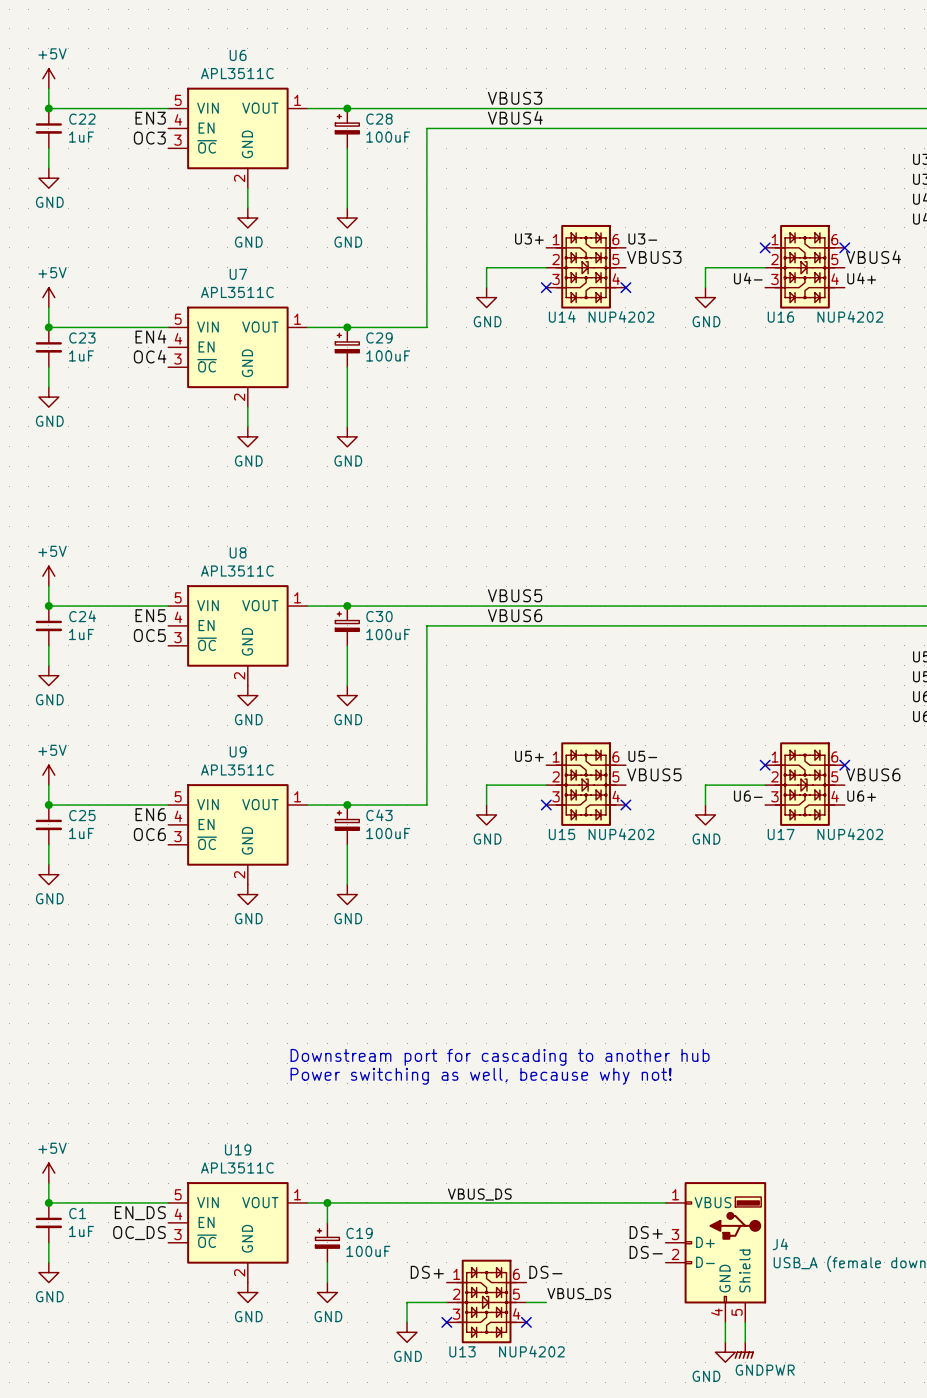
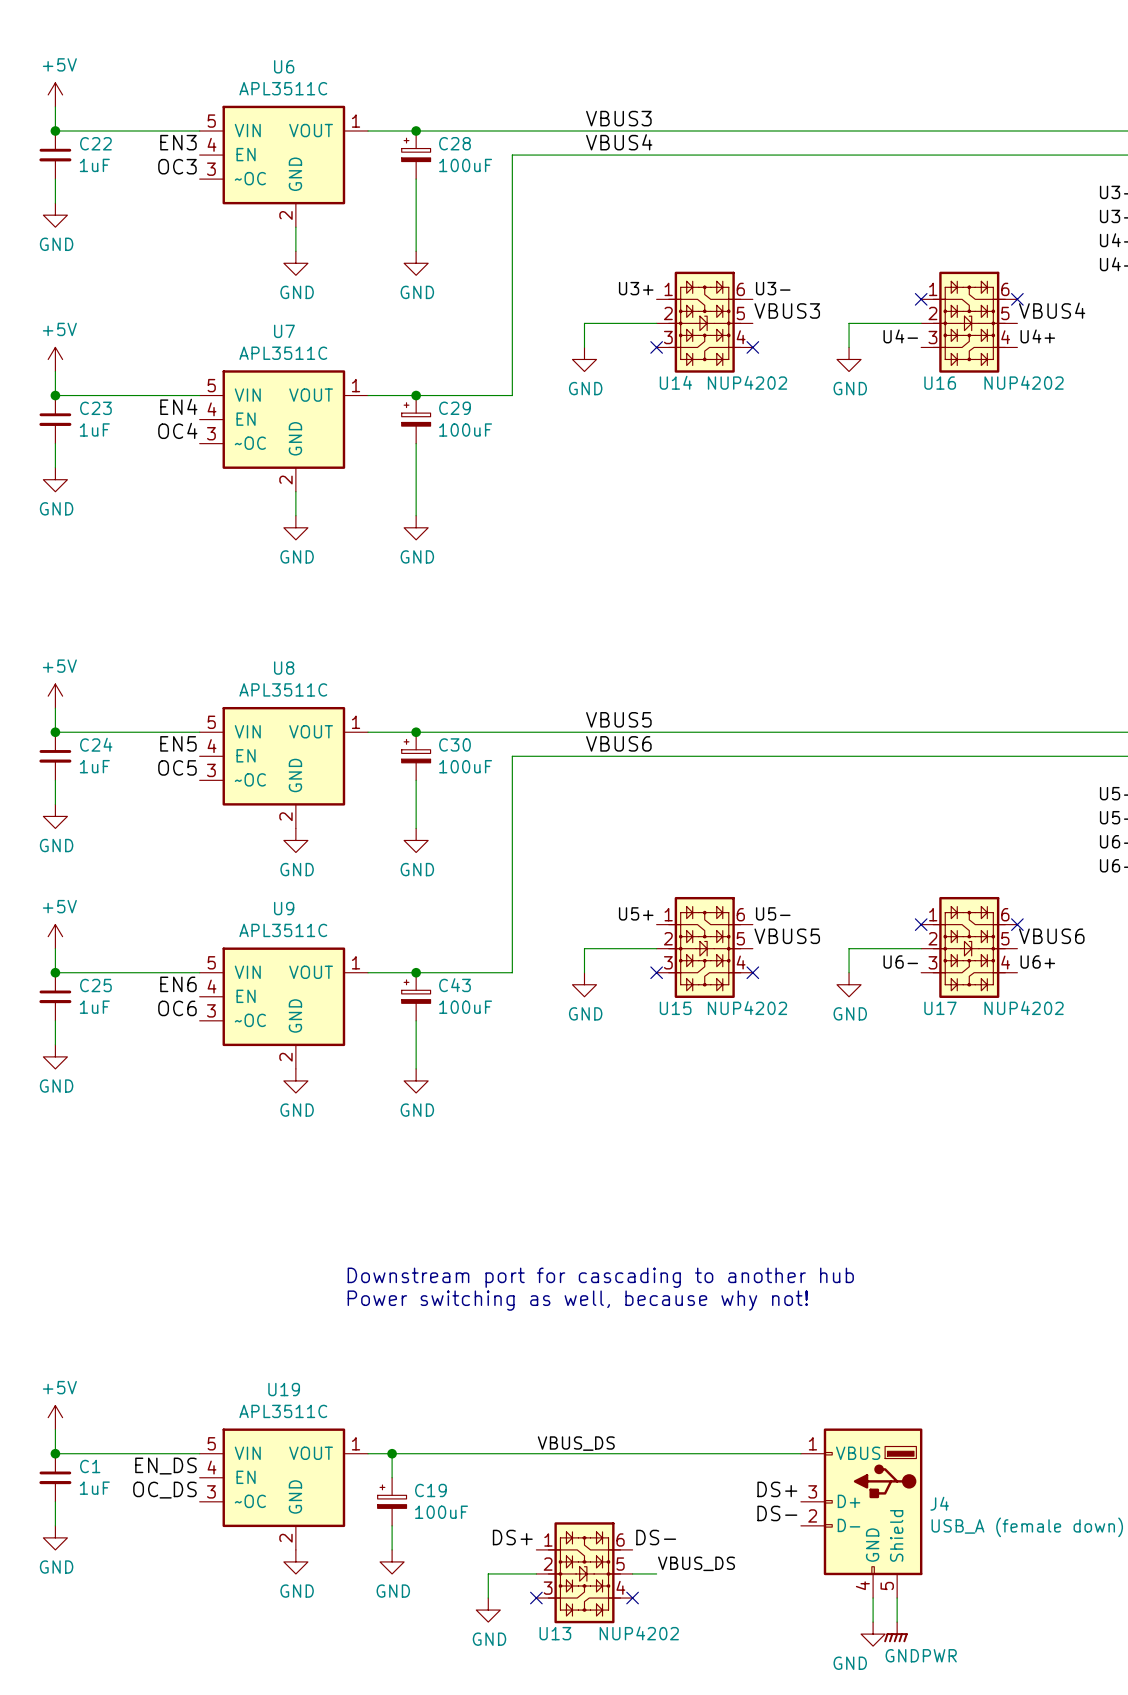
U6 pin name: ~{OC} (207, 146) -> ~OC (250, 178)
U7 pin name: ~{OC} (207, 365) -> ~OC (250, 443)
U8 pin name: ~{OC} (207, 644) -> ~OC (250, 779)
U9 pin name: ~{OC} (207, 843) -> ~OC (250, 1020)
U19 pin name: ~{OC} (207, 1241) -> ~OC (250, 1501)

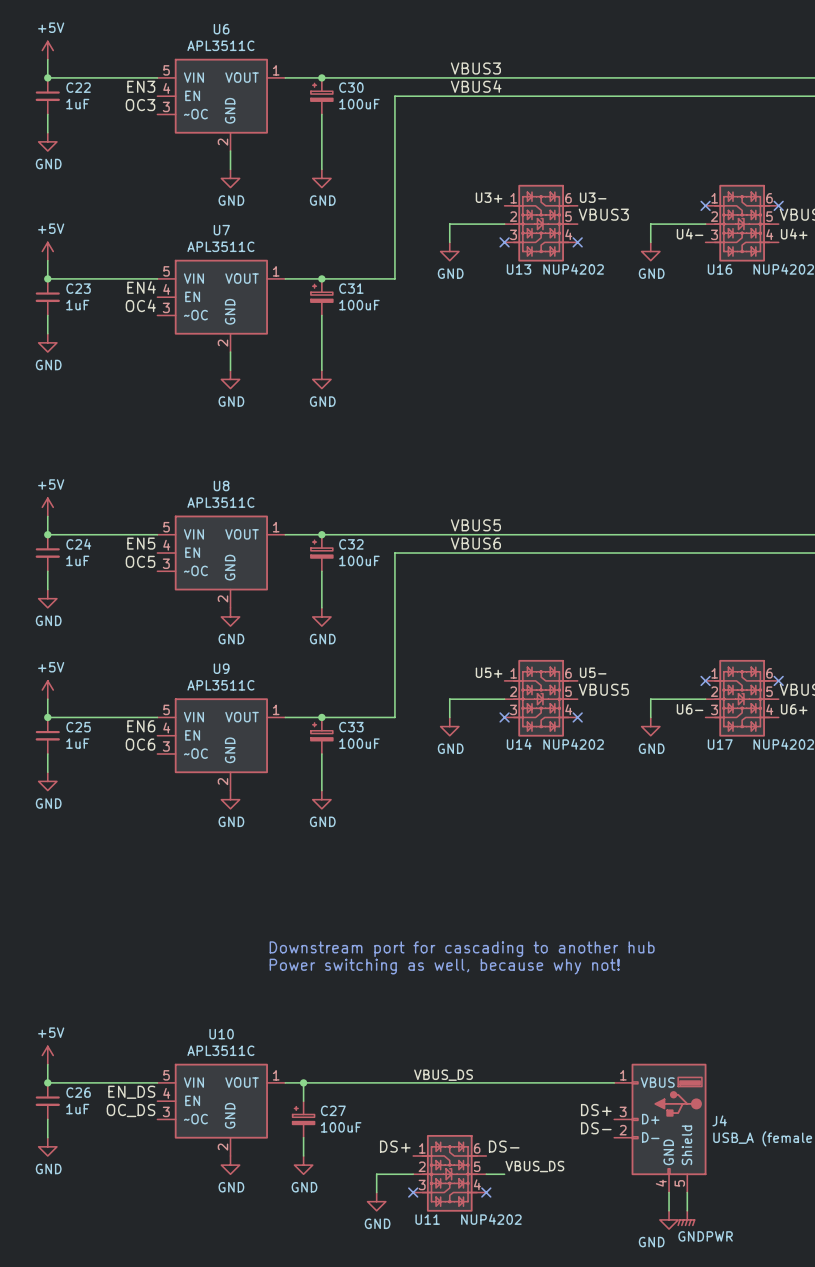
C28 name: C28 (454, 143) -> C30 (351, 87)
U14 name: U14 (675, 382) -> U13 (519, 269)
C29 name: C29 (454, 408) -> C31 (351, 288)
C30 name: C30 (454, 744) -> C32 (351, 544)
C43 name: C43 (454, 985) -> C33 (351, 727)
U15 name: U15 (675, 1008) -> U14 (519, 744)
U19 name: U19 (284, 1389) -> U10 (221, 1034)
C1 name: C1 (90, 1466) -> C26 (78, 1092)
C19 name: C19 (430, 1490) -> C27 (333, 1110)
U13 name: U13 (555, 1633) -> U11 (427, 1219)

